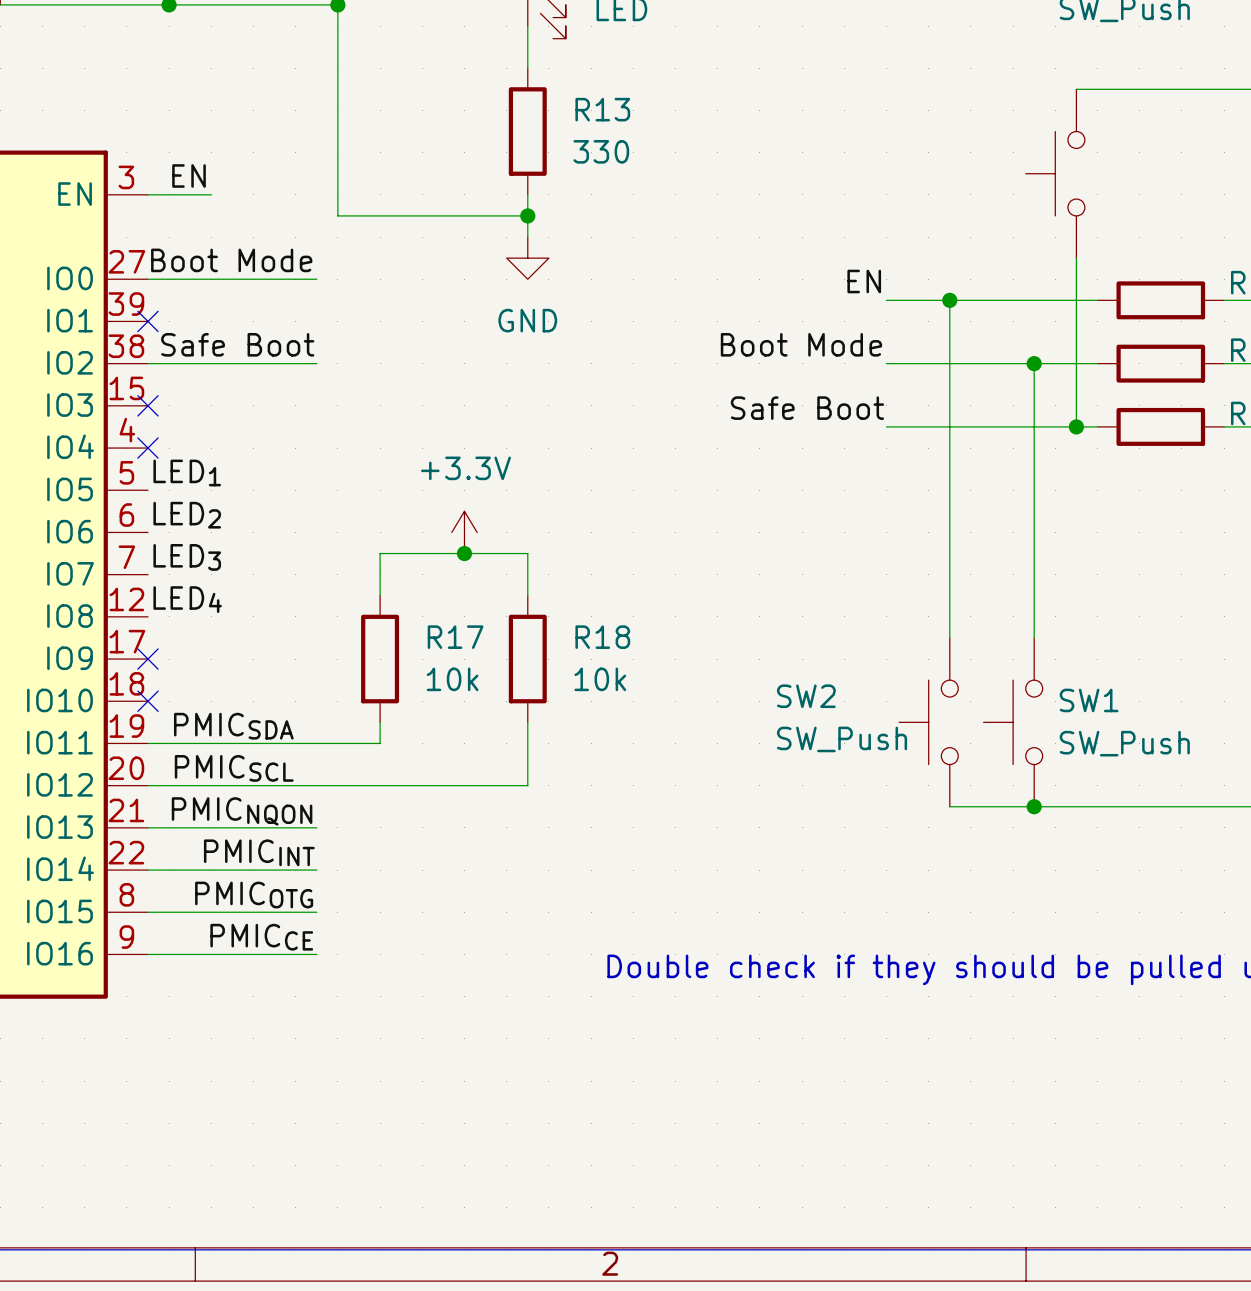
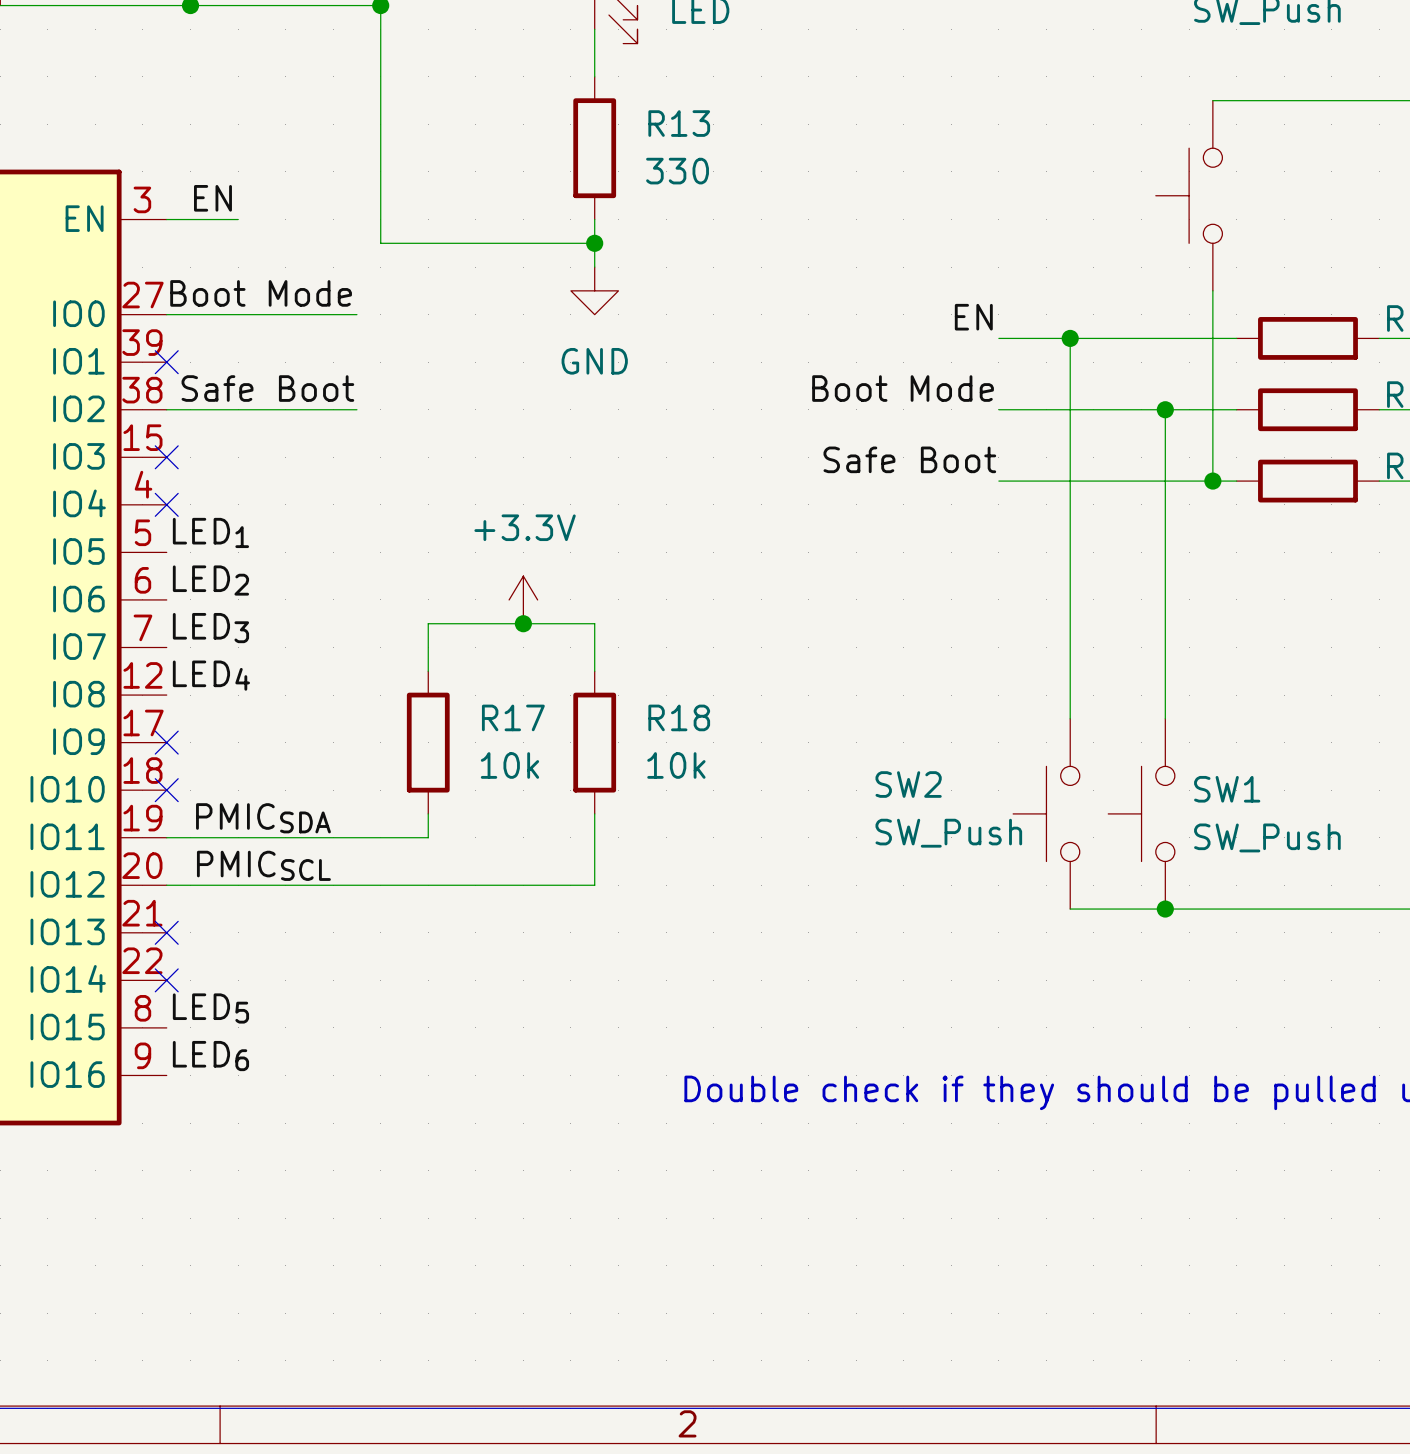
label: PMICNQON (242, 811) -> none
wire: (147, 827) (316, 827) -> none
no-connect mark: none -> (166, 932)
label: PMICINT (259, 852) -> none
wire: (147, 870) (316, 870) -> none
no-connect mark: none -> (166, 980)
label: none -> LED5 (210, 1008)
label: PMICOTG (254, 895) -> none
wire: (147, 912) (316, 912) -> none
label: none -> LED6 (210, 1056)
label: PMICCE (261, 937) -> none
wire: (147, 954) (316, 954) -> none

